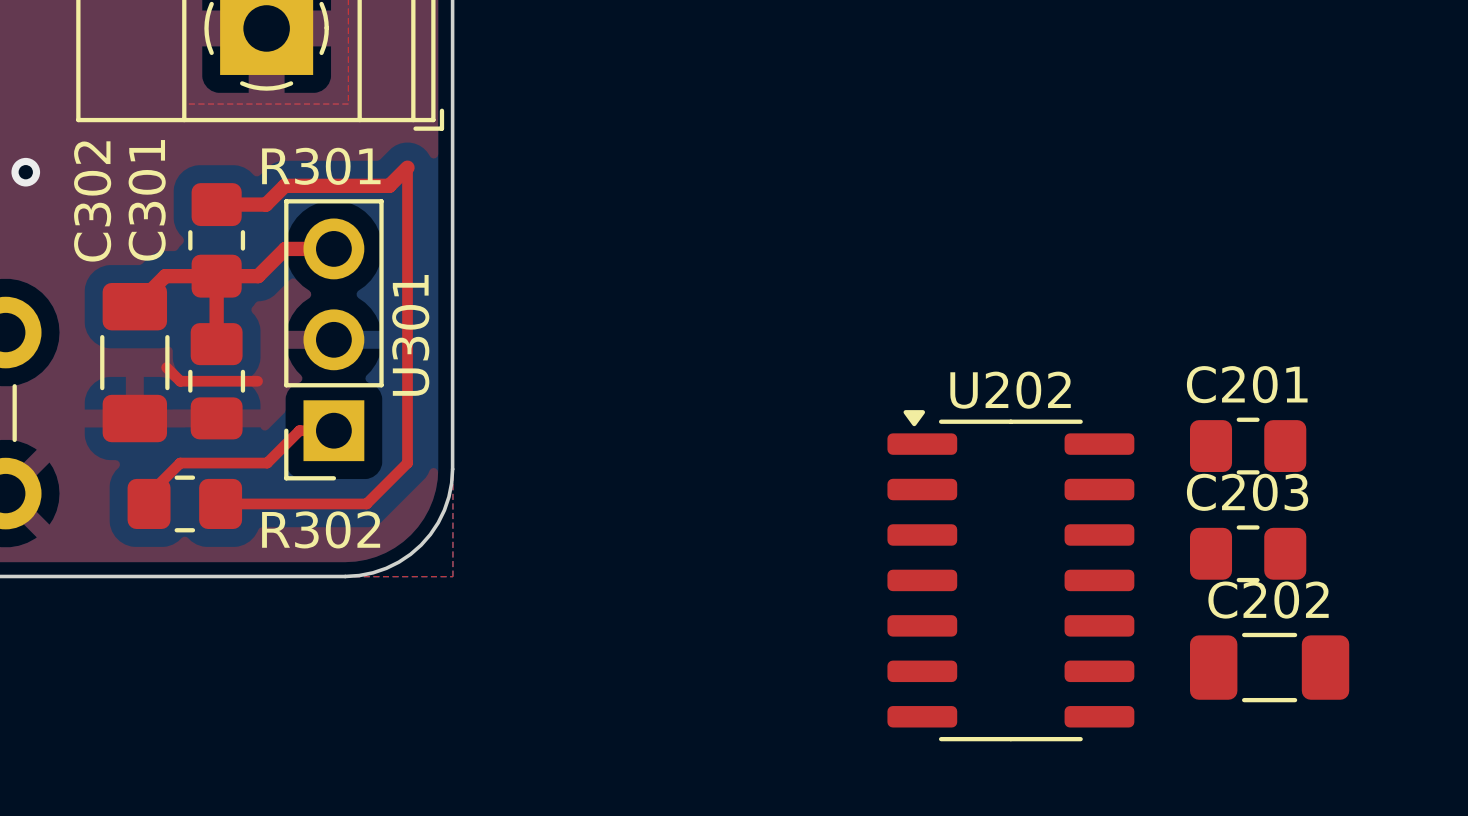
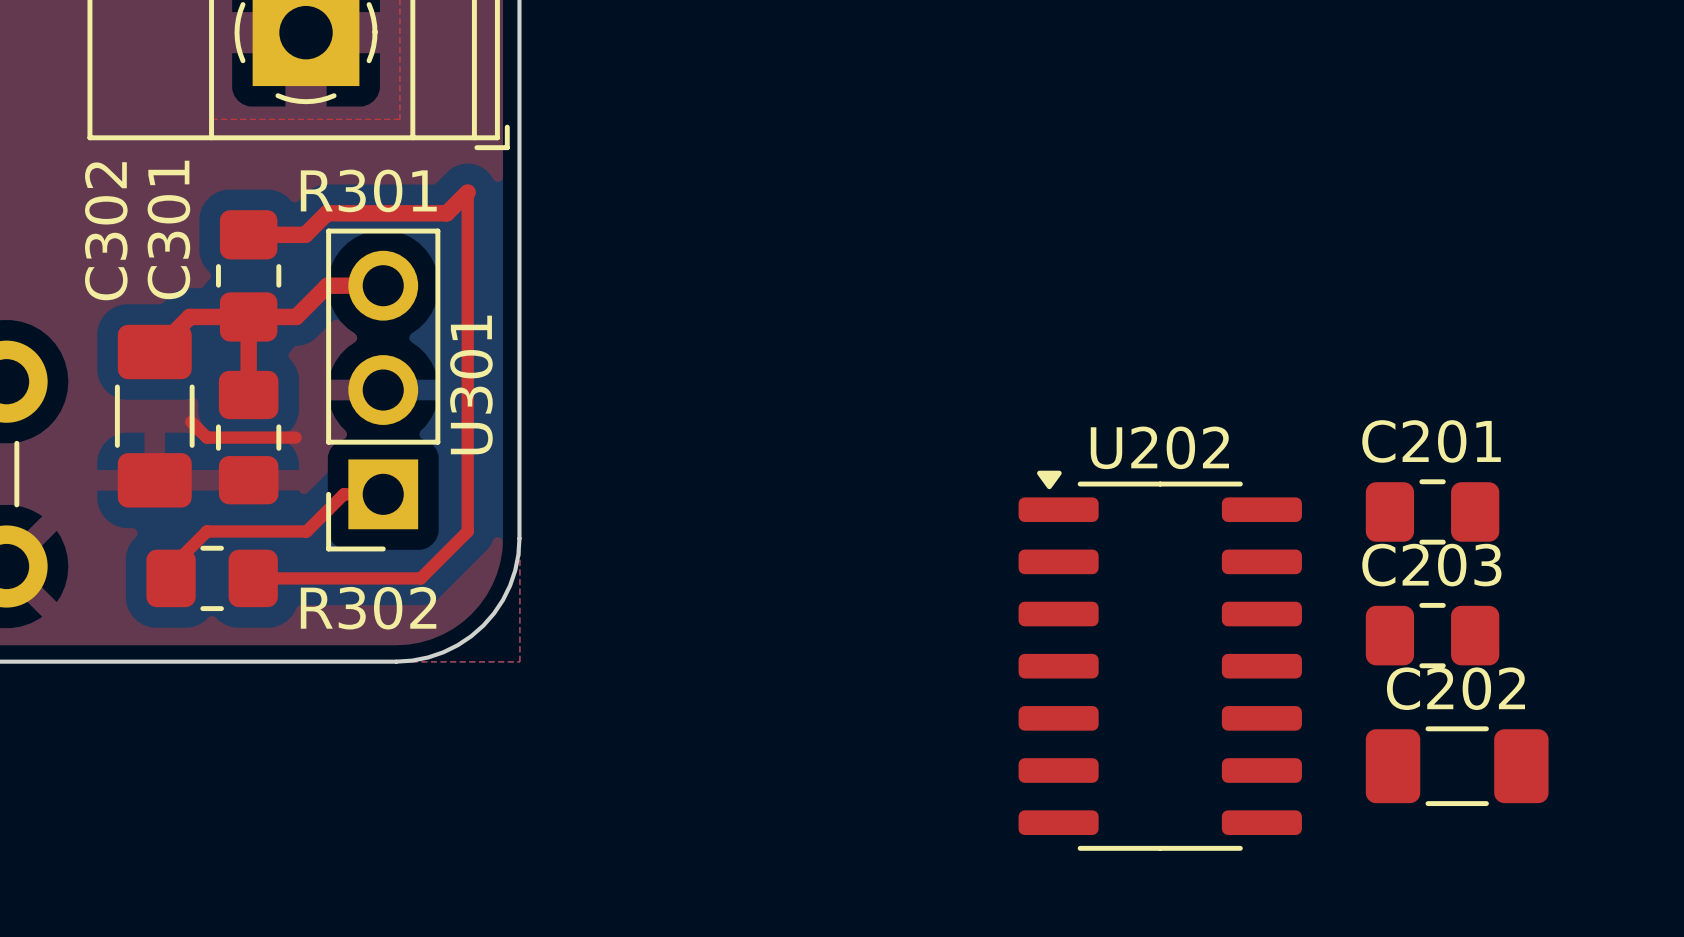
via: (25, 172) -> none

